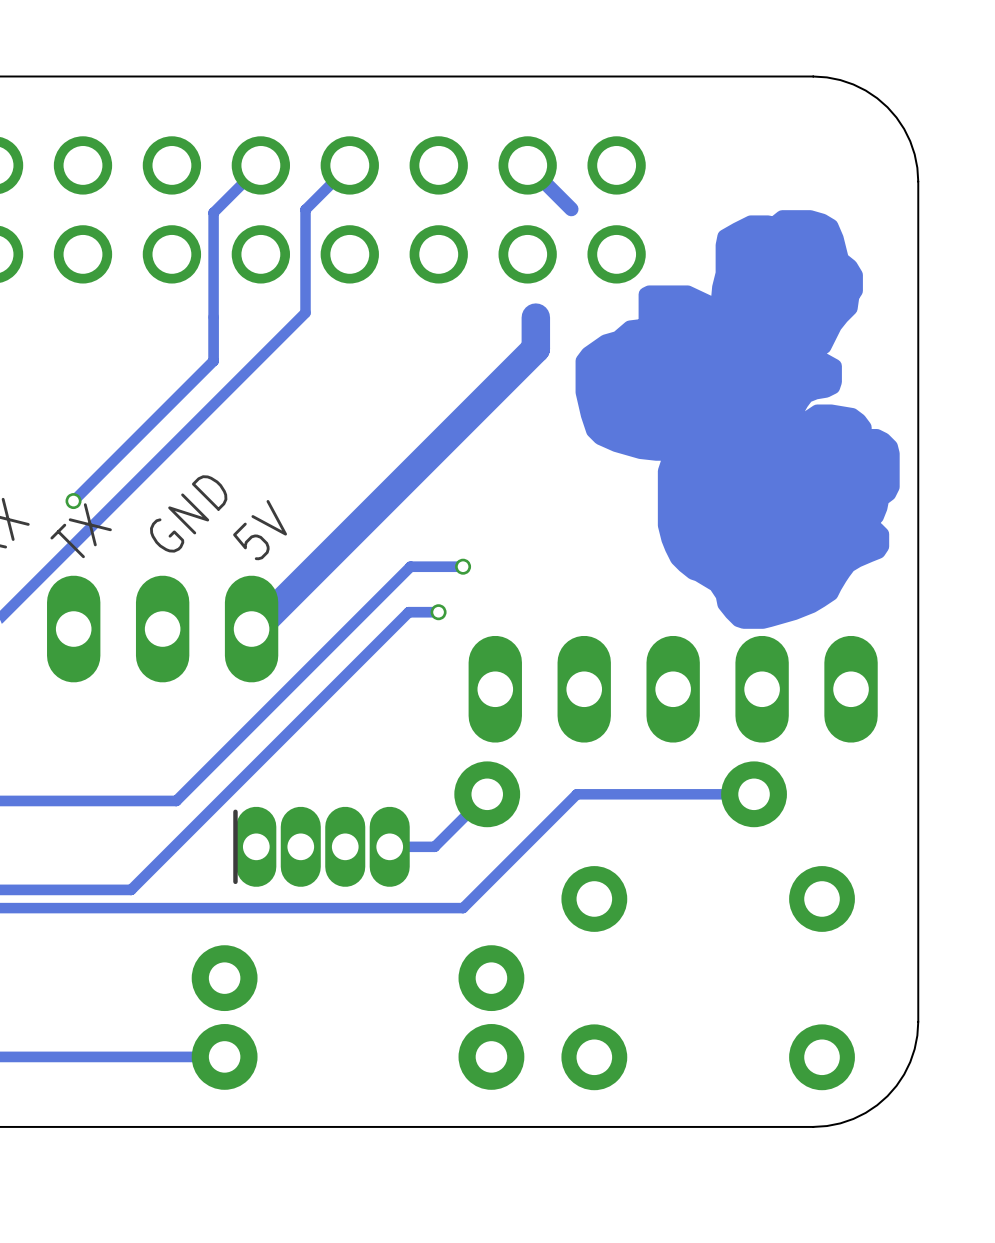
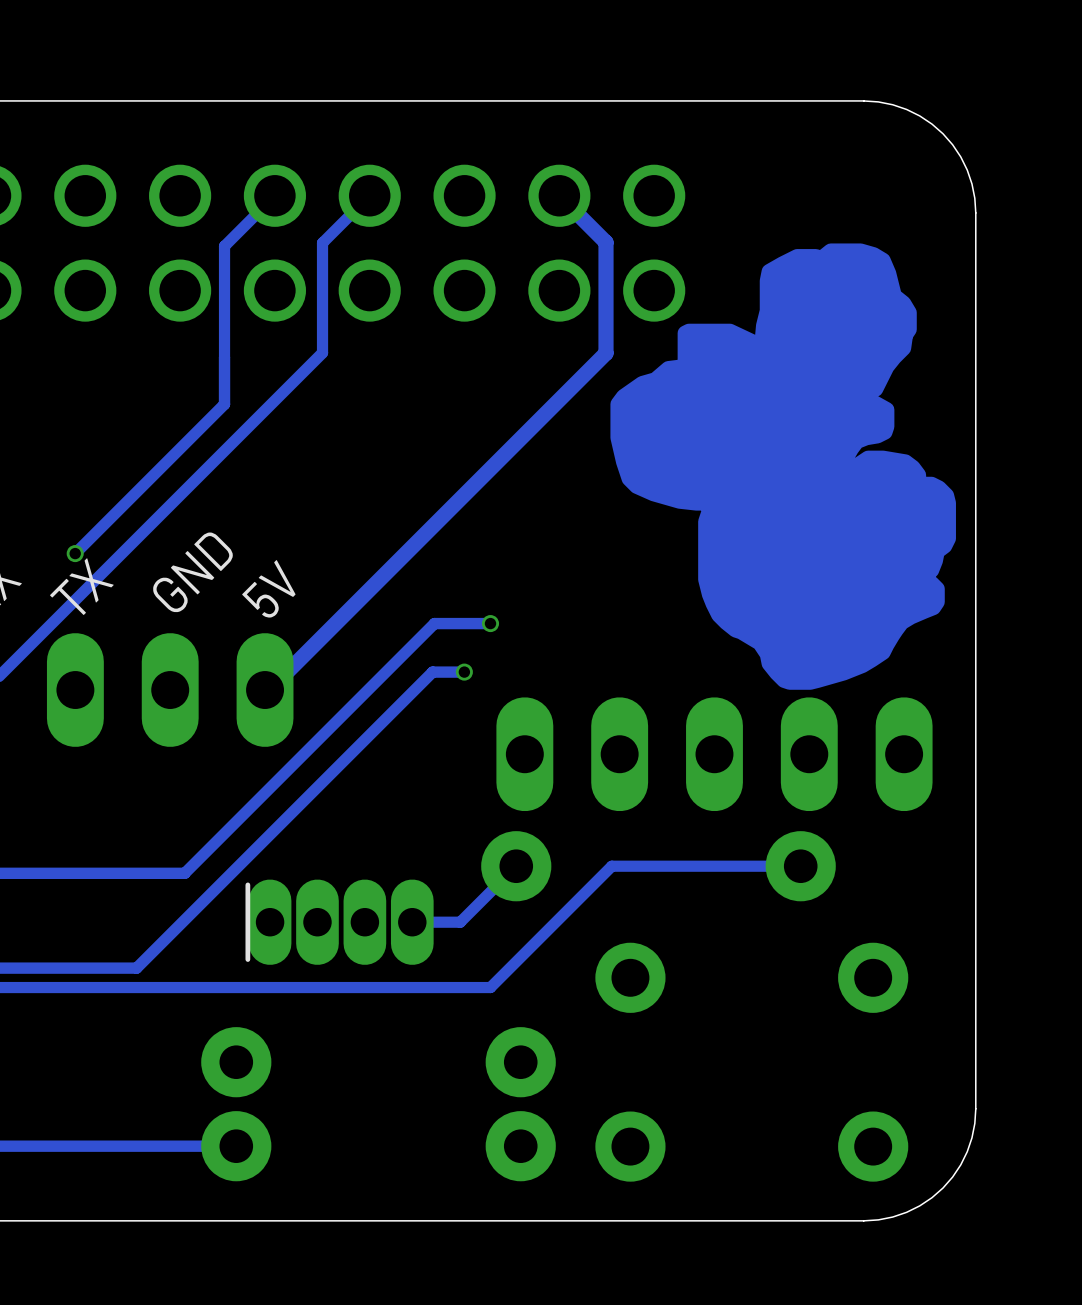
track: (535, 317) (535, 348) -> (606, 242) (606, 353) (568, 391)
track width: thick (535, 348) (255, 629) -> thin (568, 391) (269, 690)

